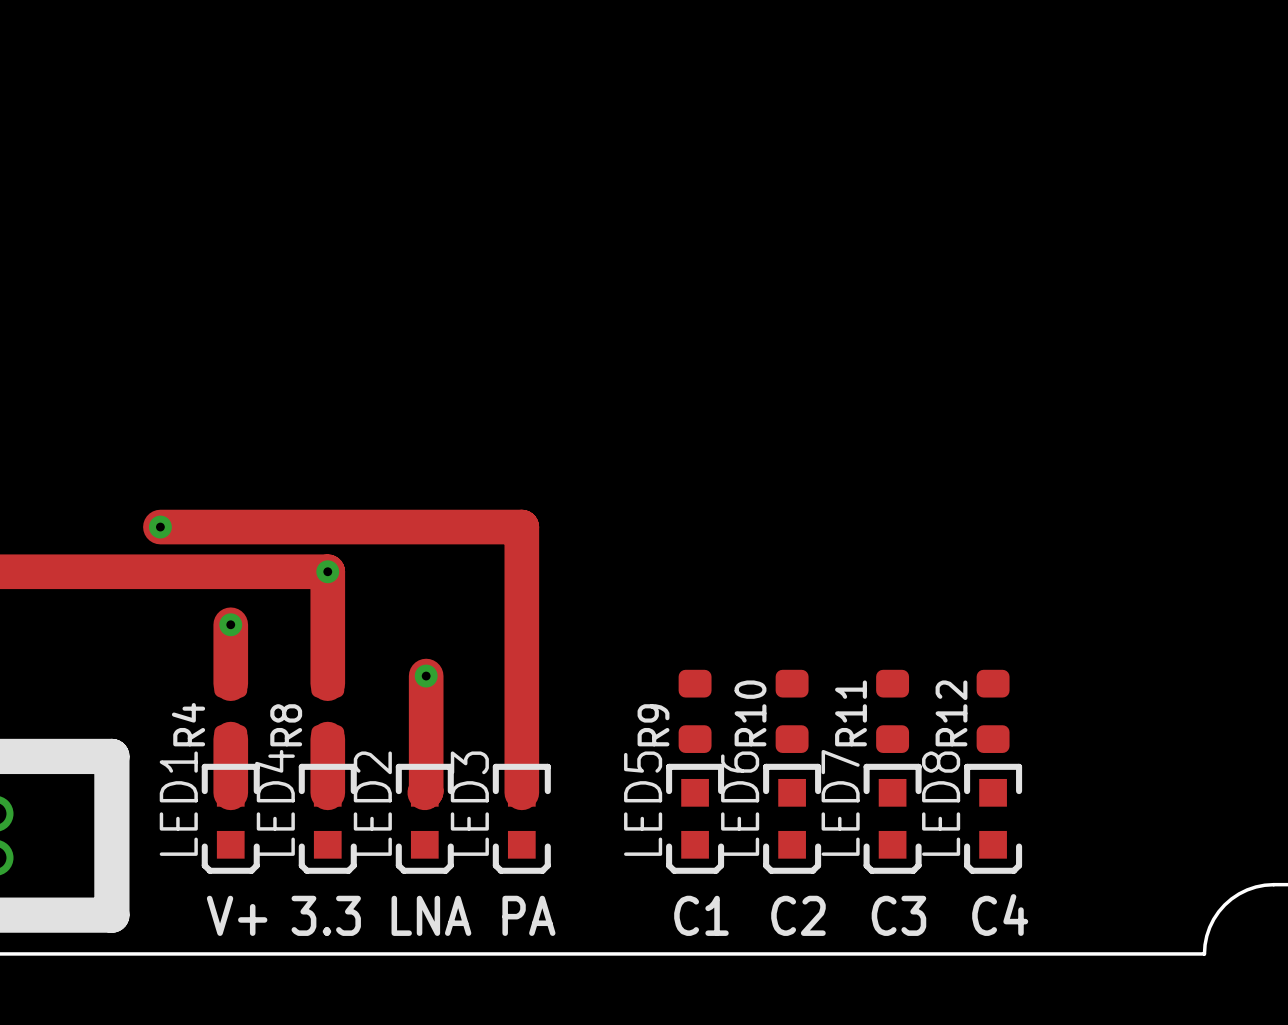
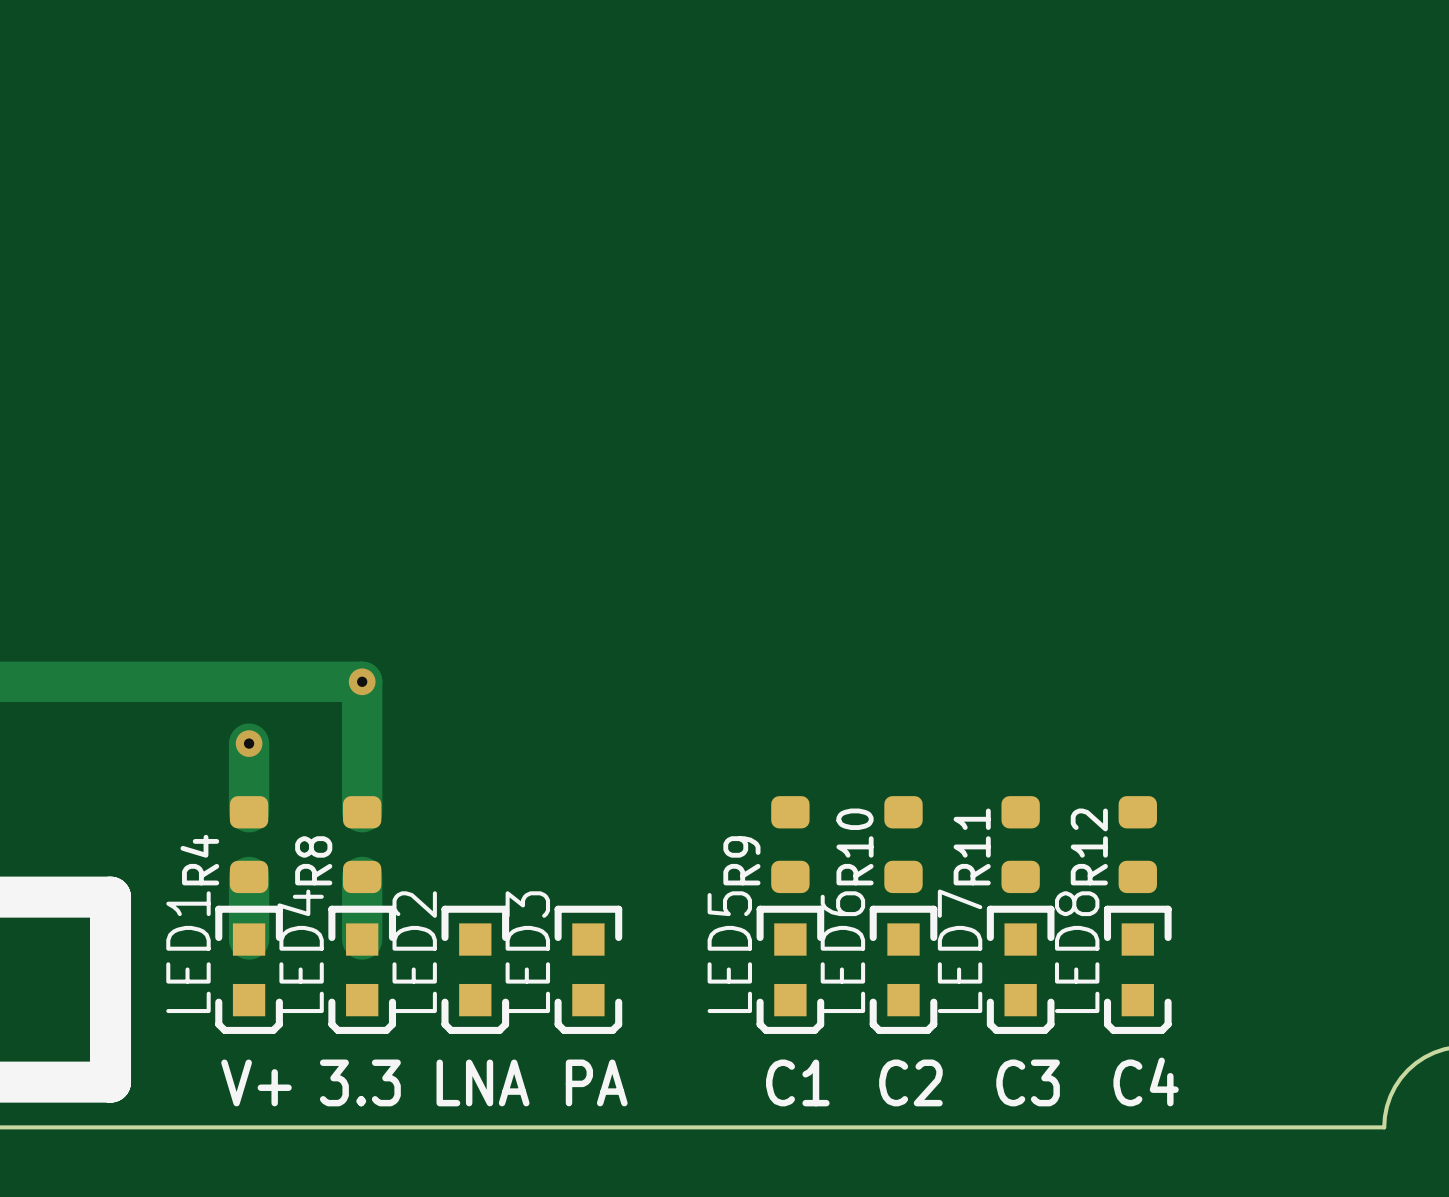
track: (160, 527) (521, 527) (521, 792) -> none
via: (160, 527) -> none
track: (426, 676) (424, 792) -> none
via: (426, 676) -> none

